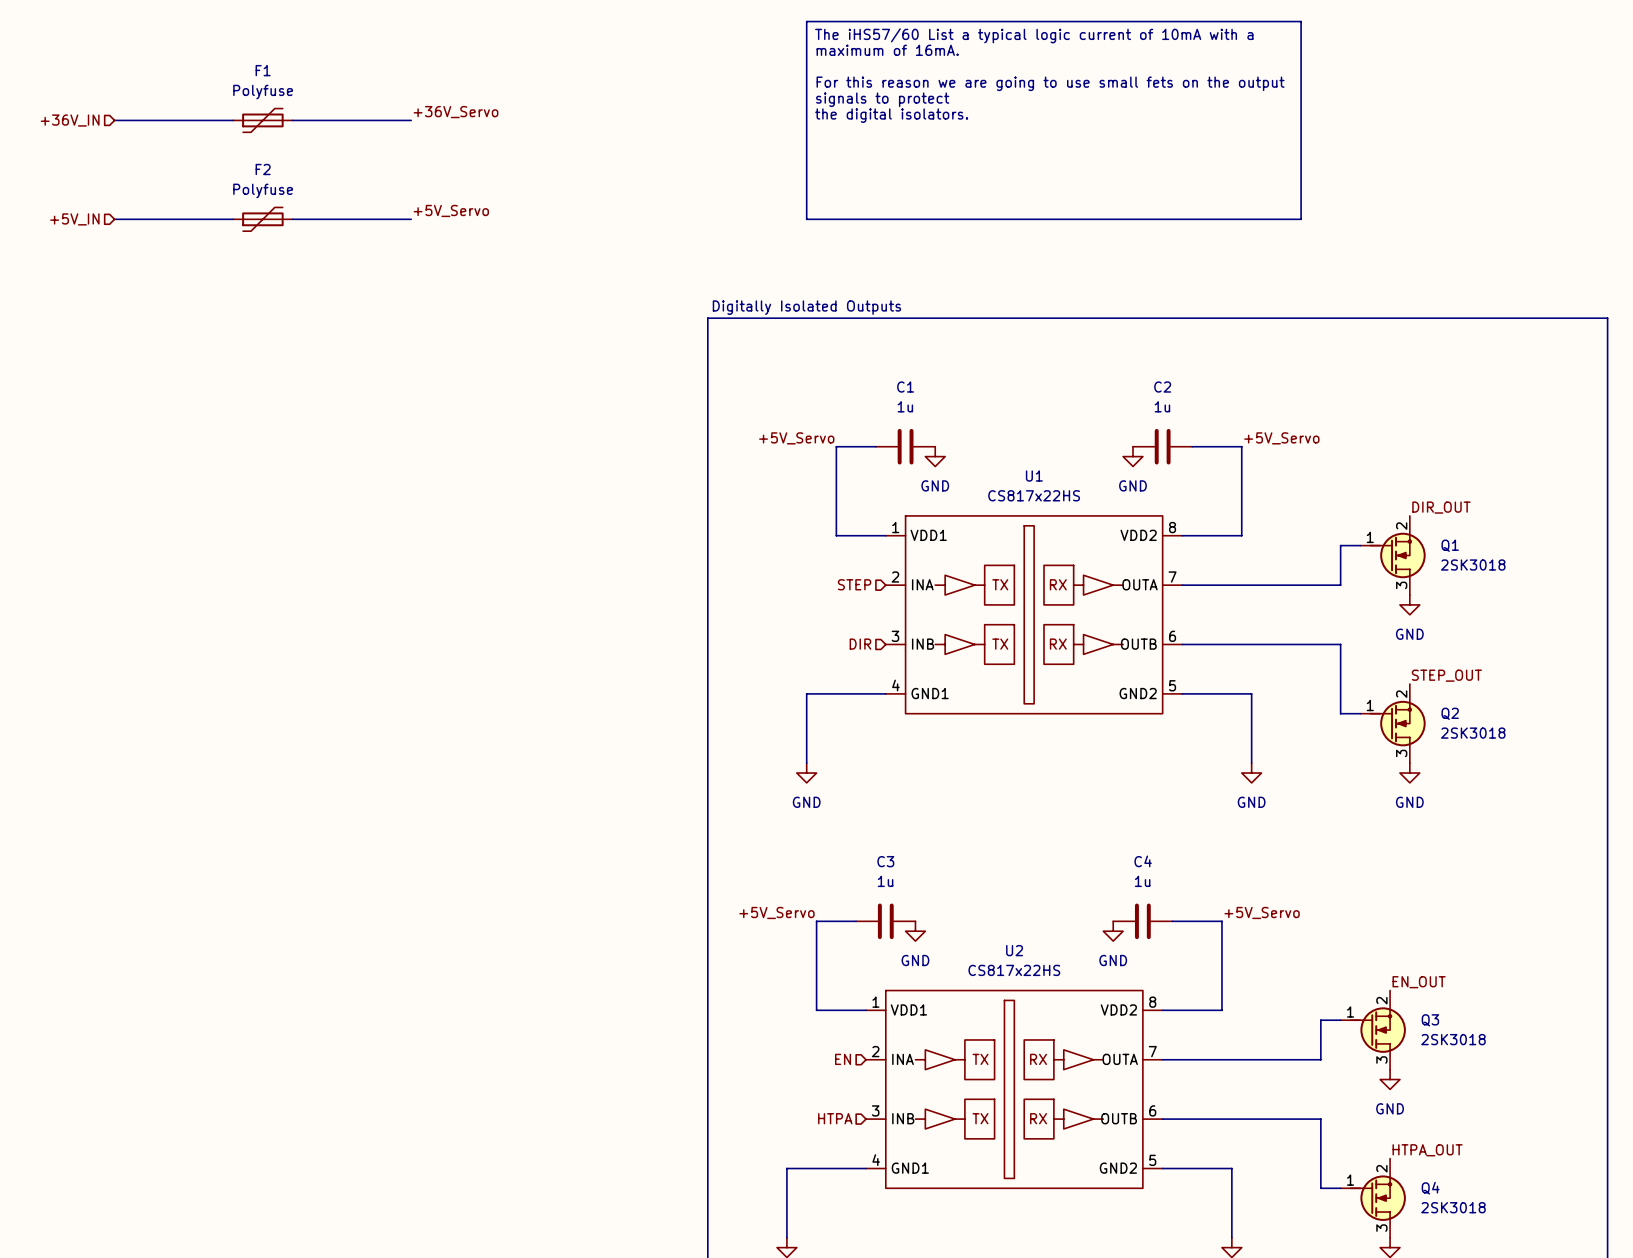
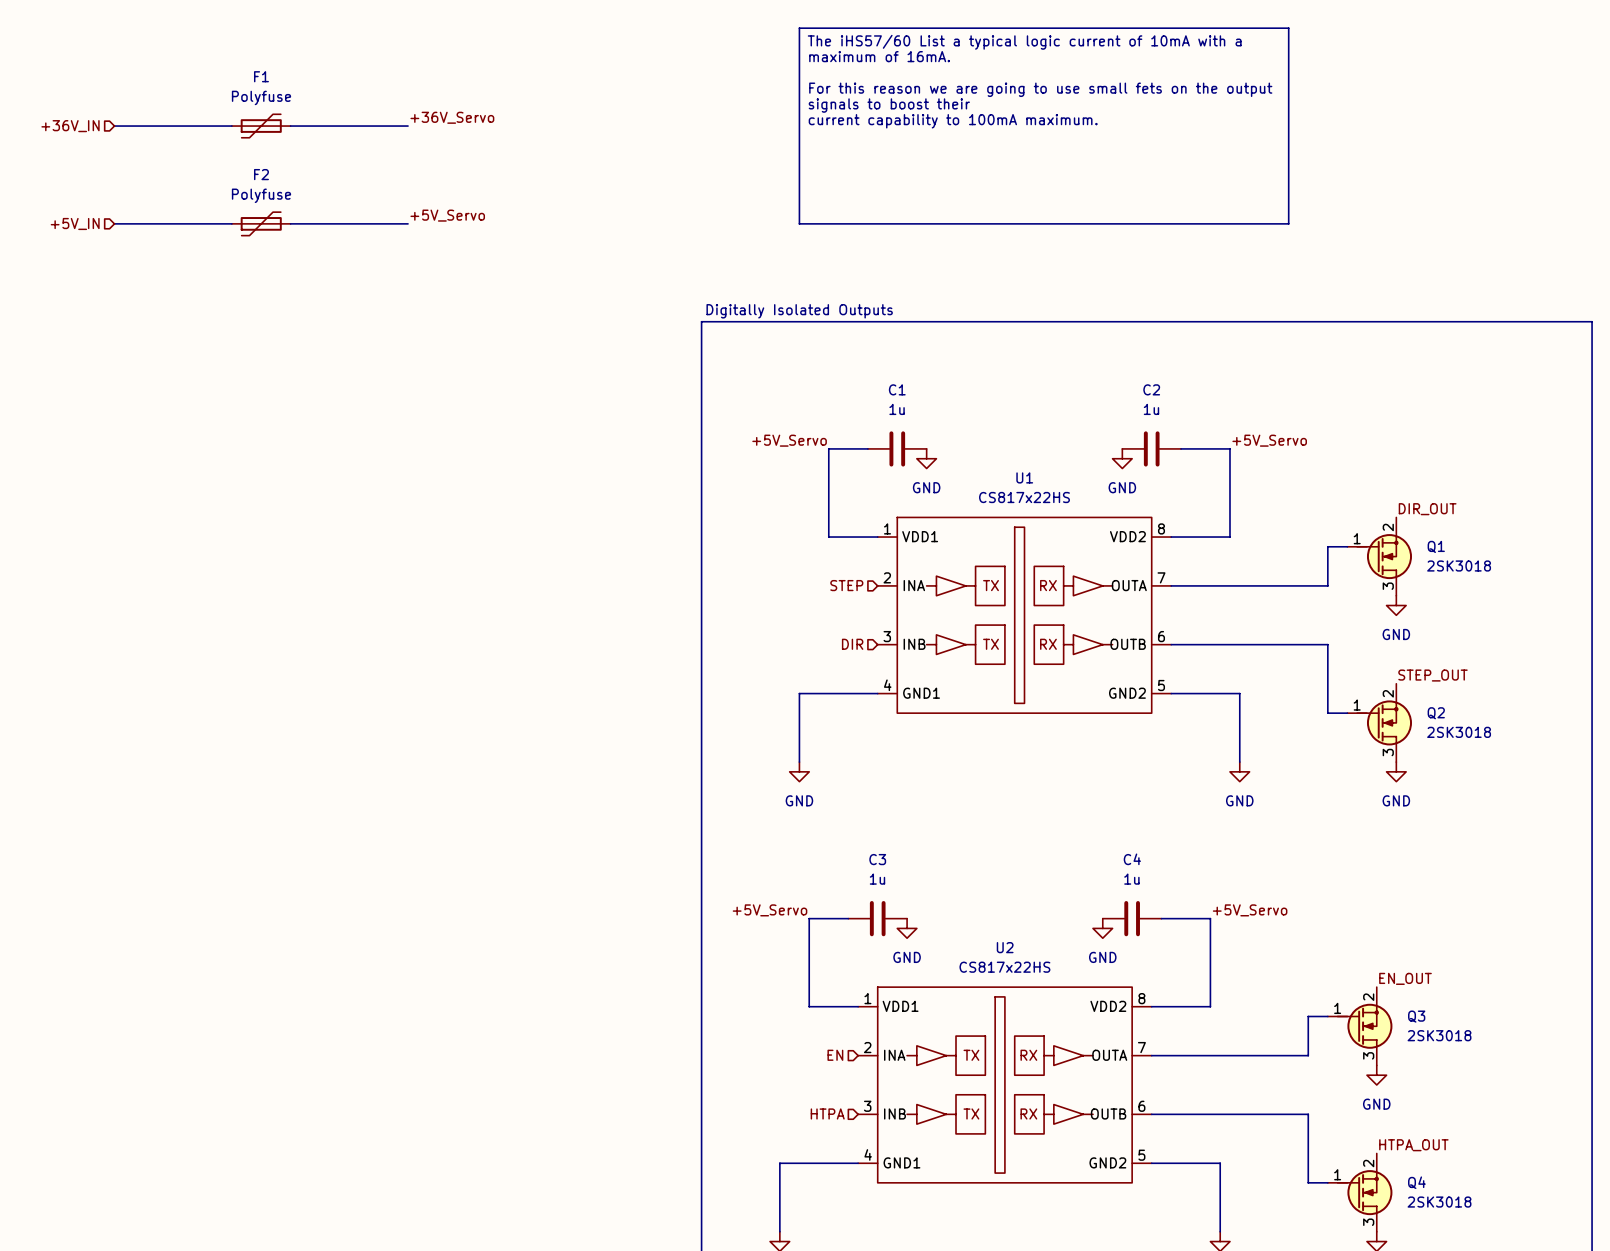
text: signals to protect (882, 99) -> signals to boost their (889, 105)
text: the digital isolators. (891, 115) -> current capability to 100mA maximum. (953, 121)

